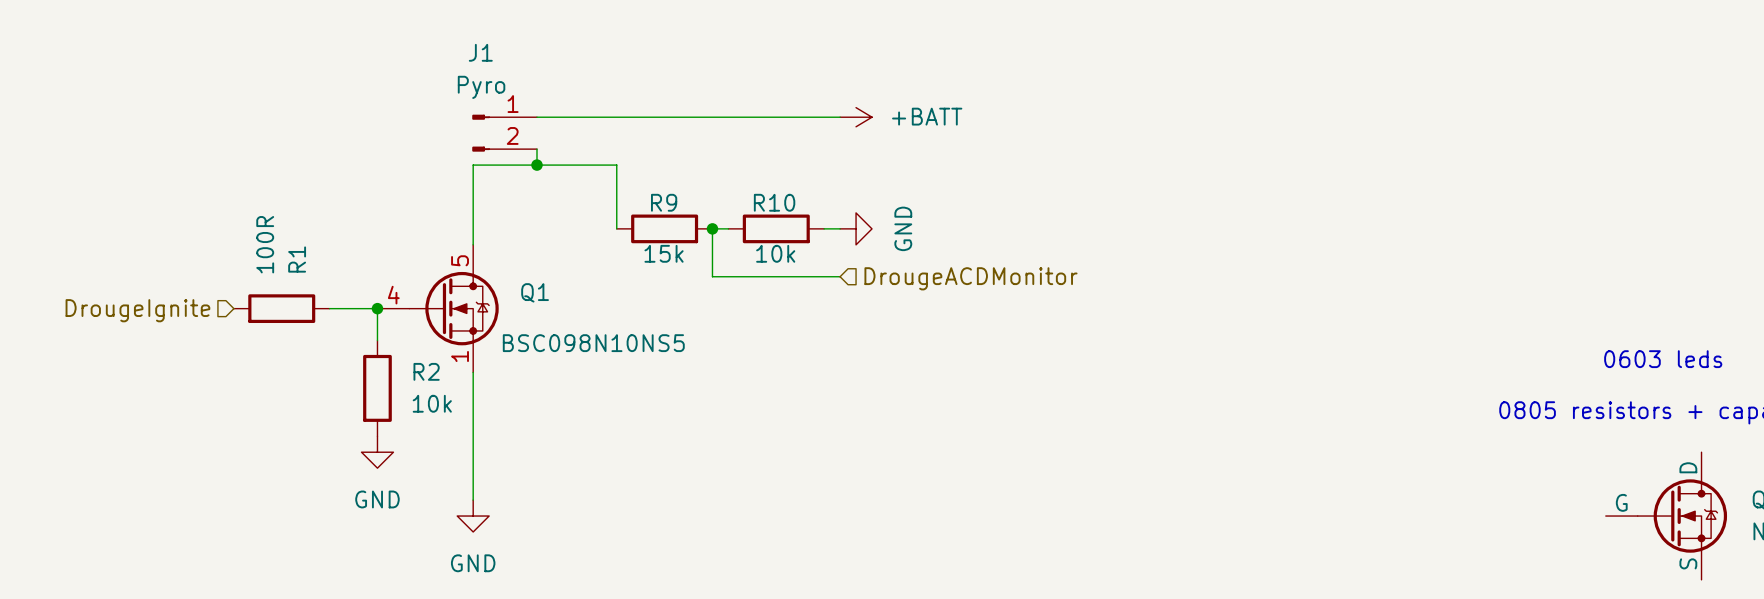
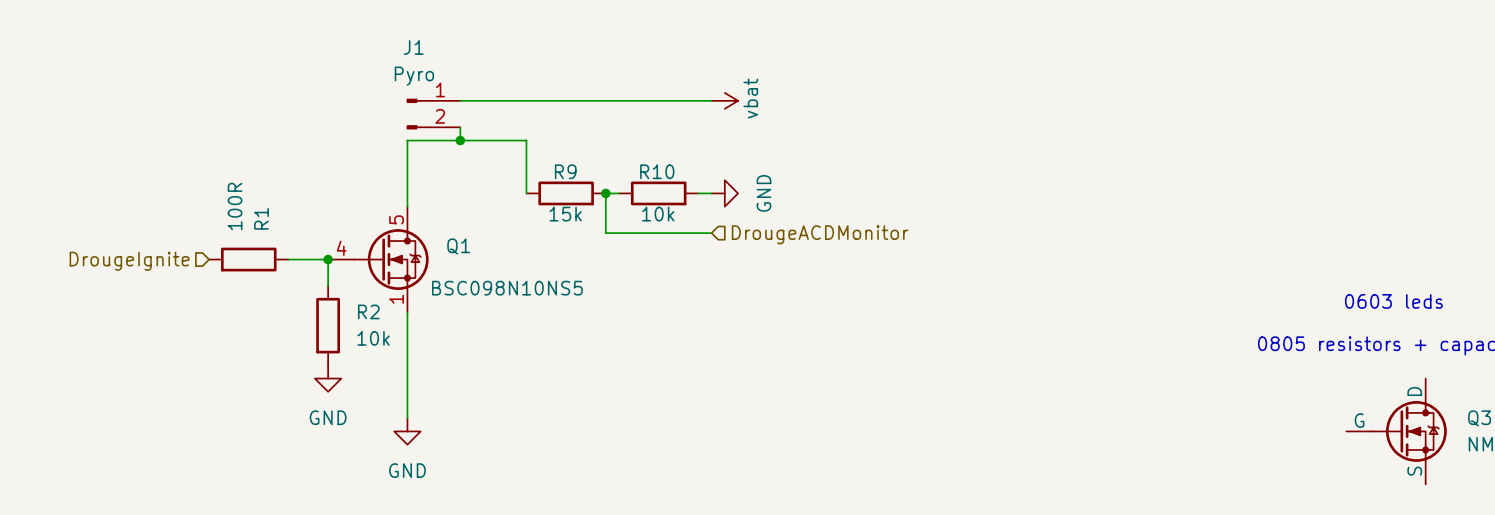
power symbol: +BATT (856, 117) -> vbat (724, 100)

